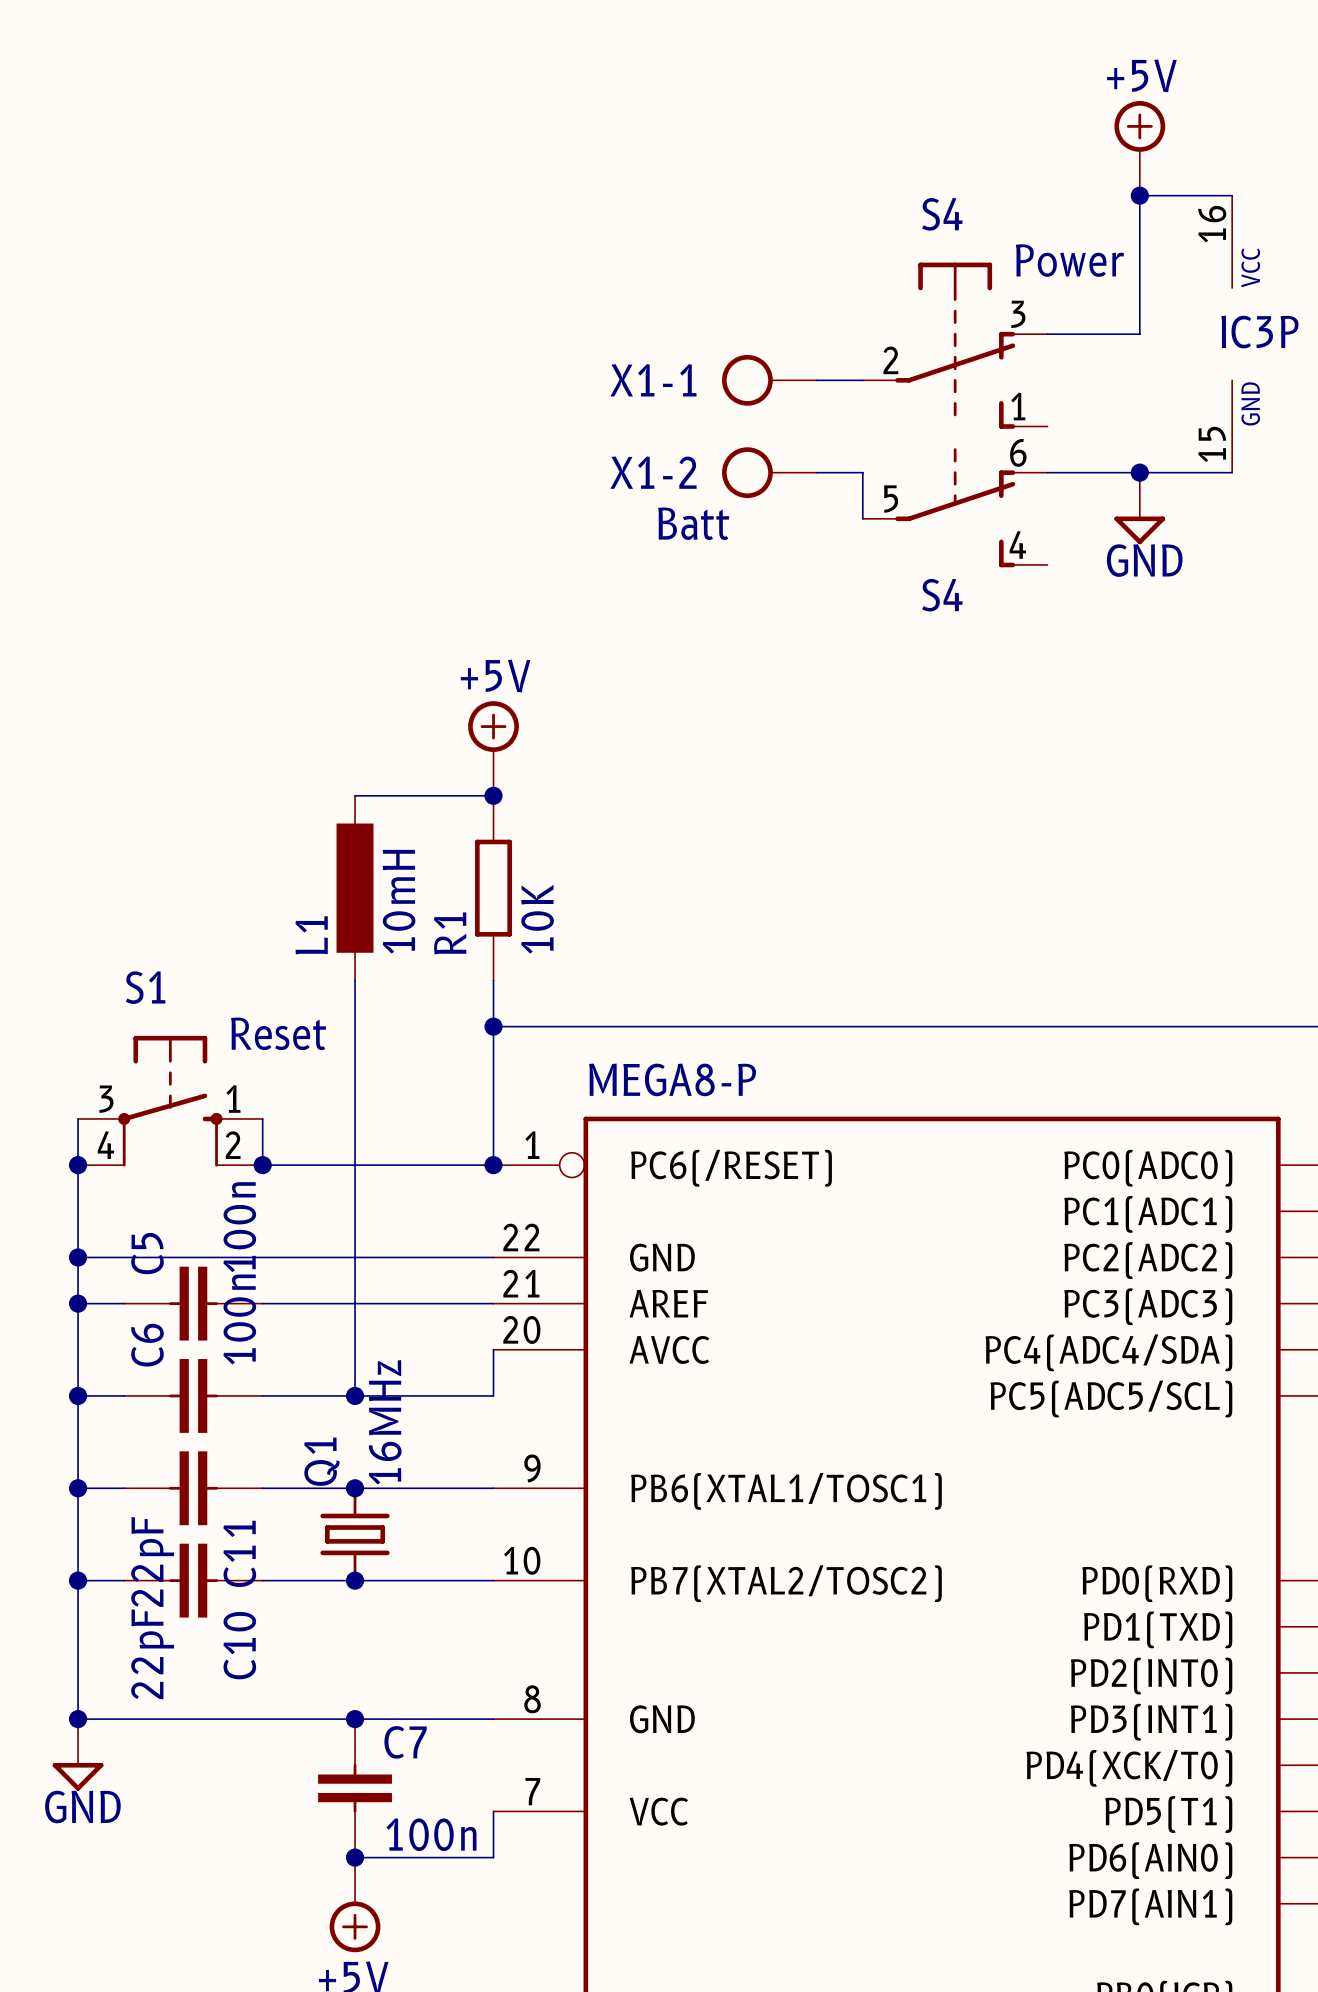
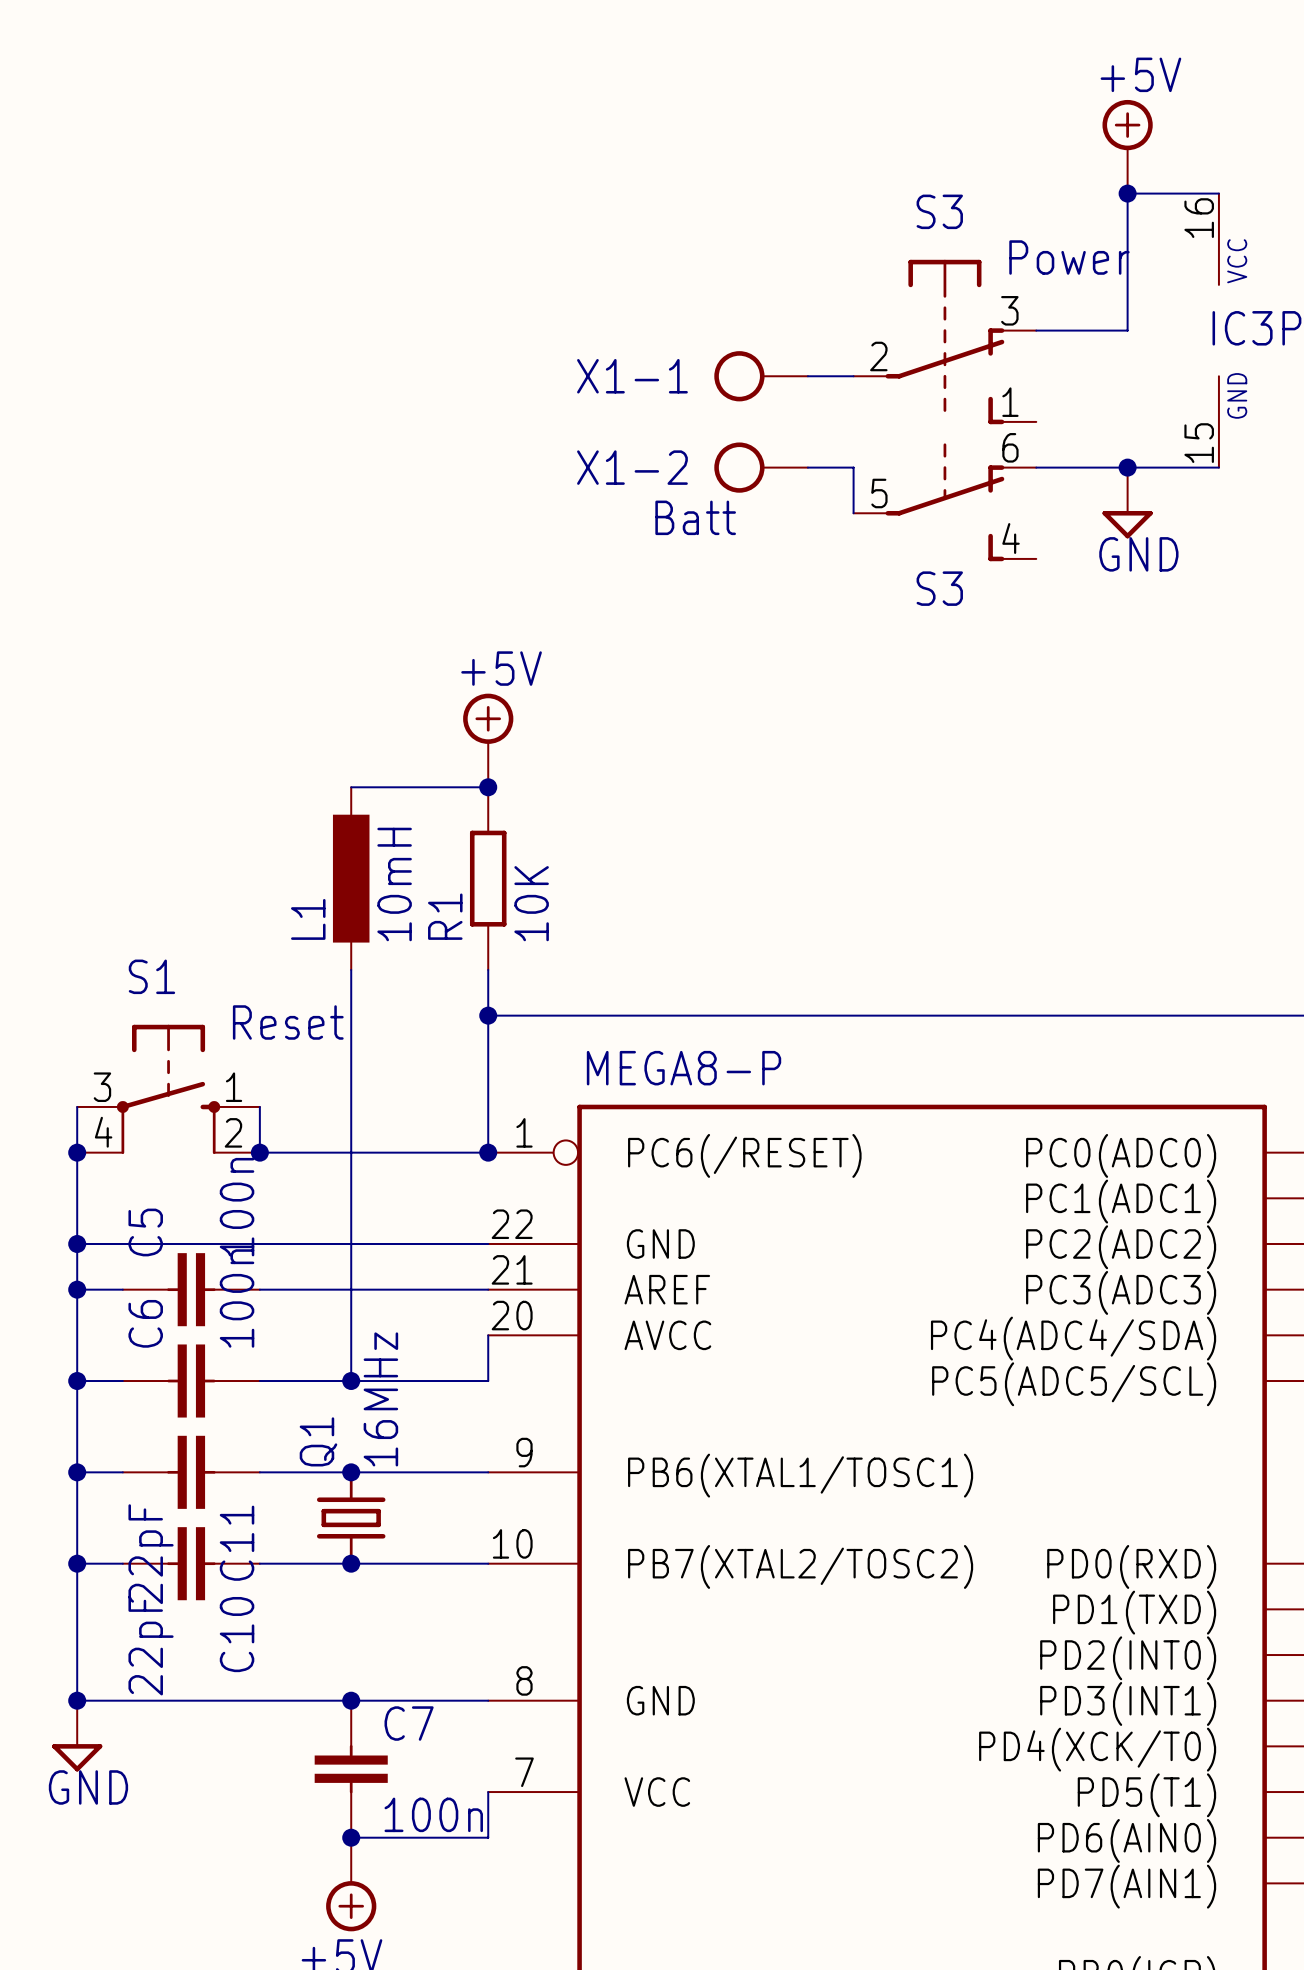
S4 name: S4 (942, 214) -> S3 (939, 211)
S4 name: S4 (942, 595) -> S3 (939, 588)

